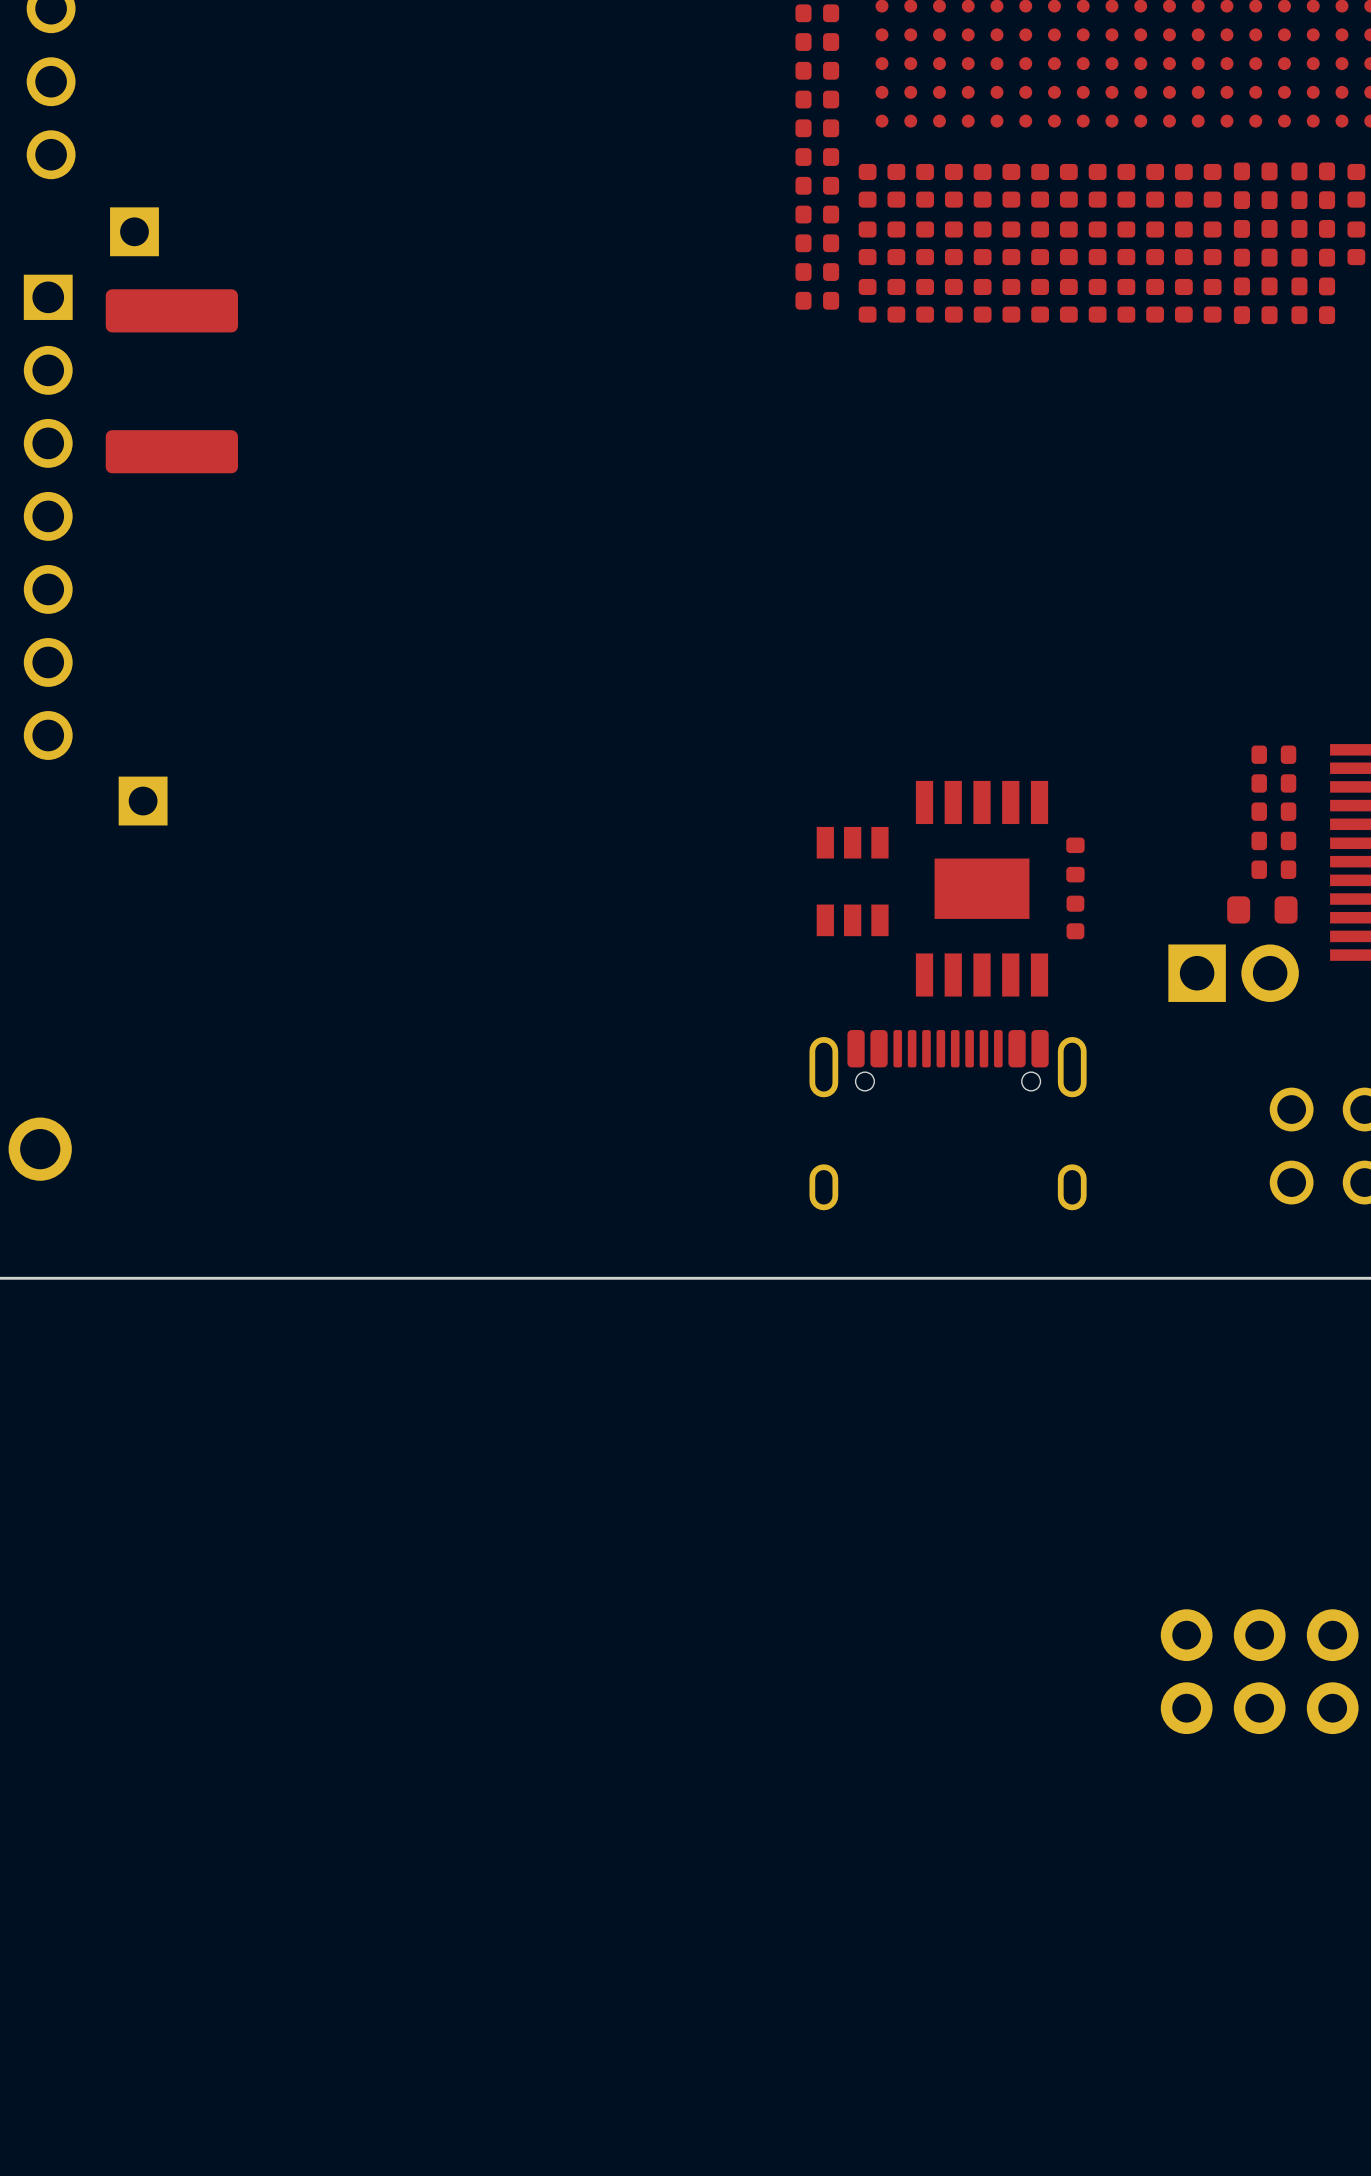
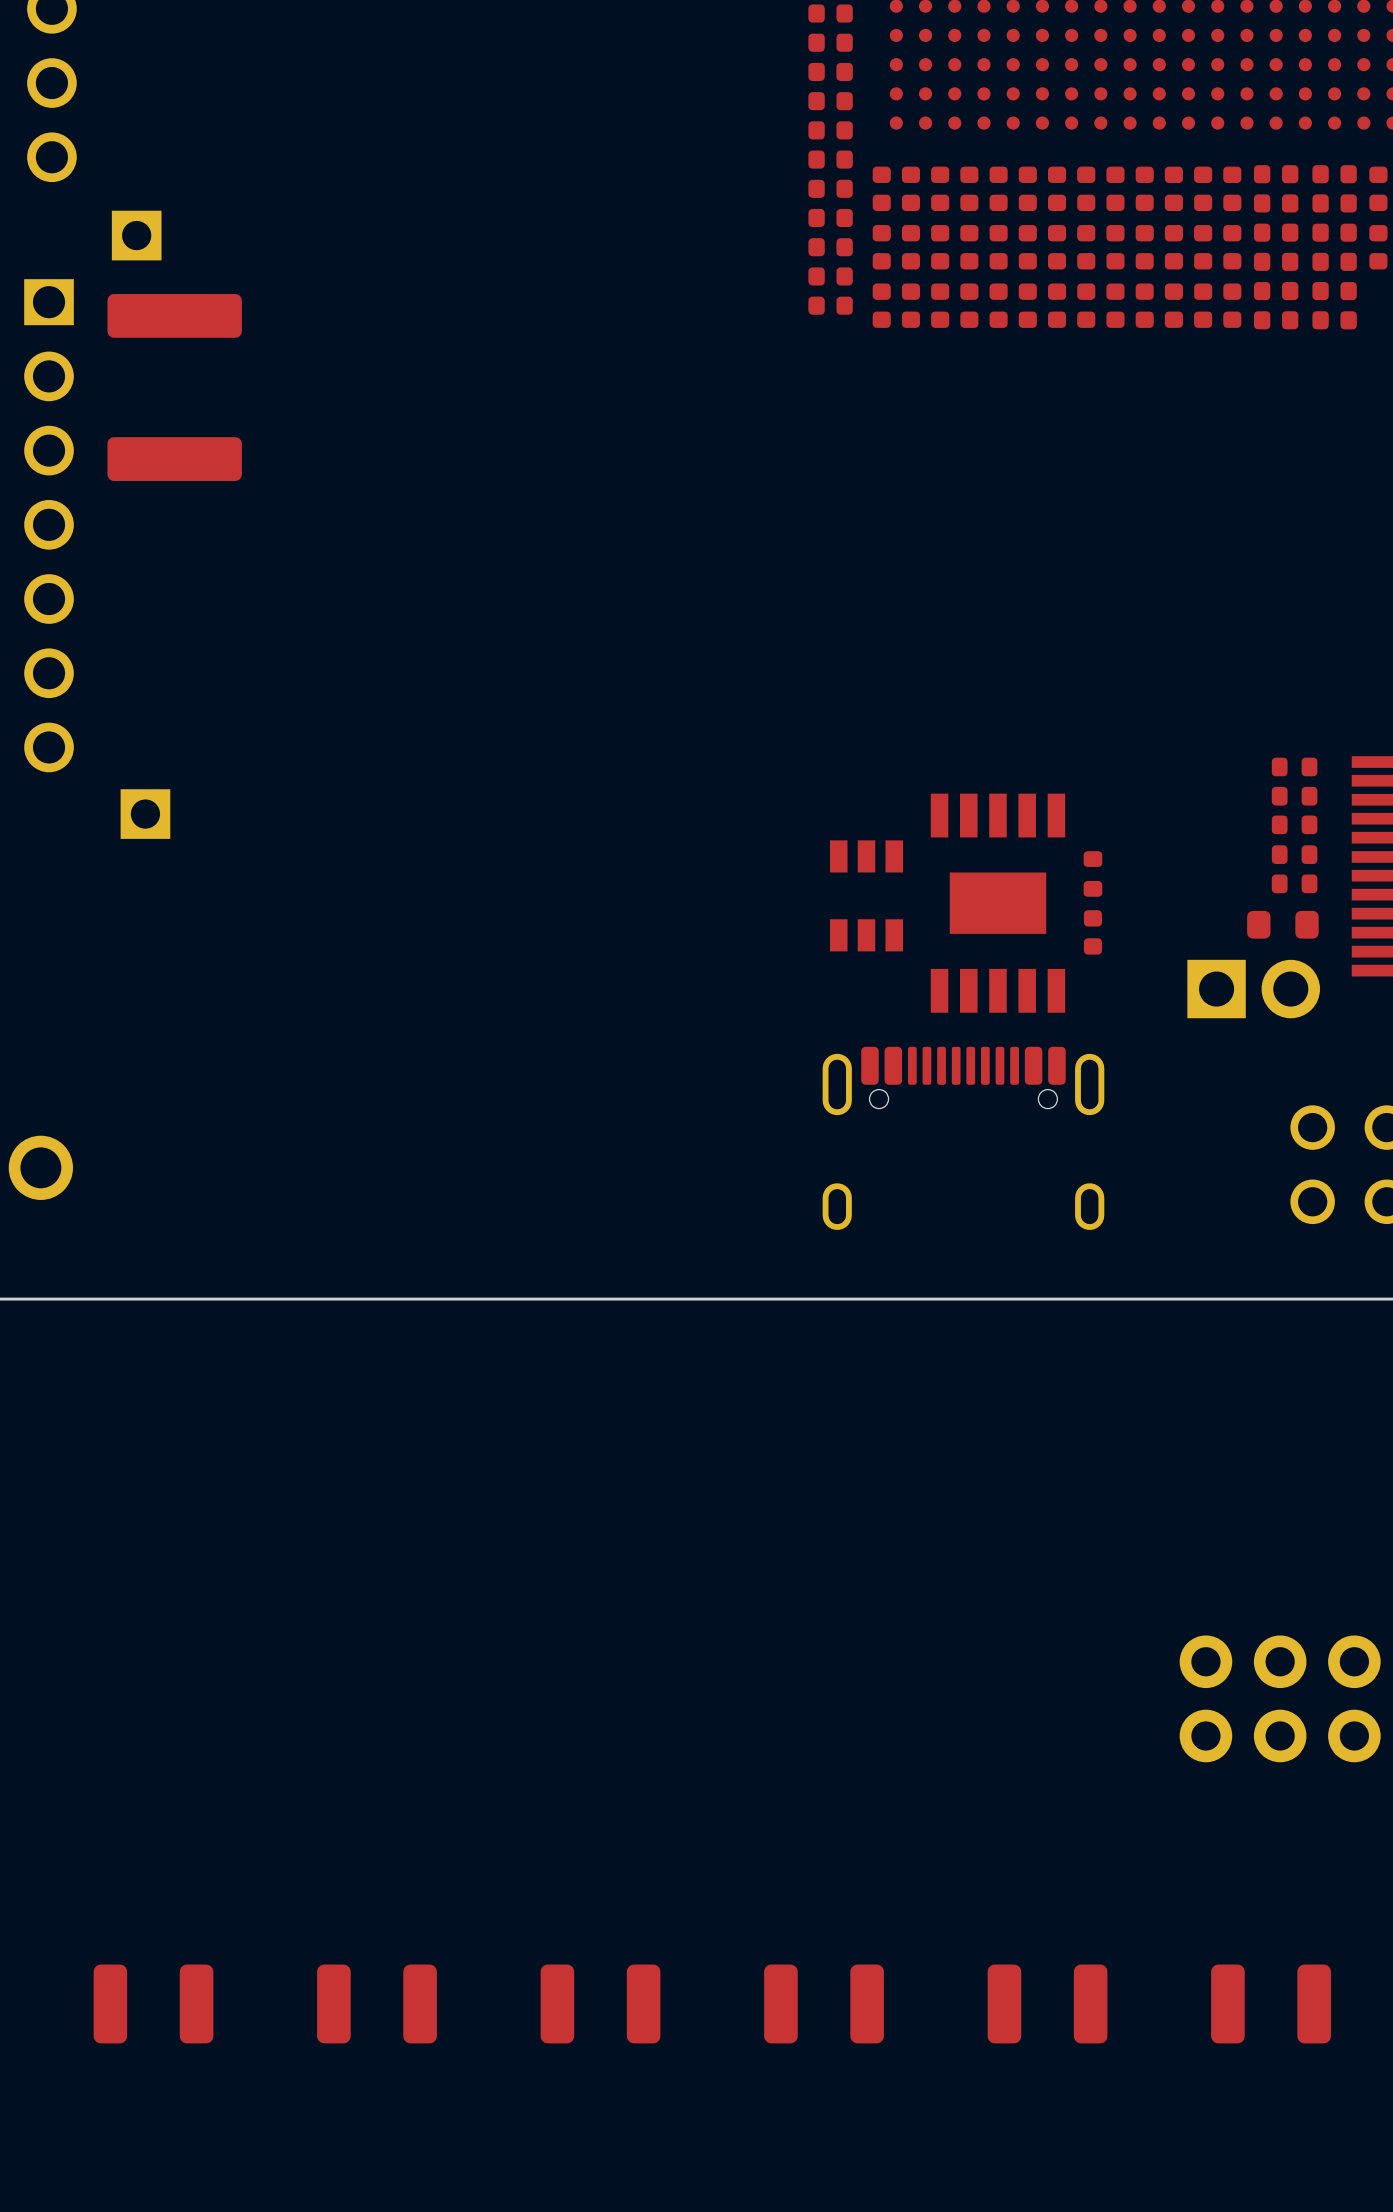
part: none -> (153, 2003)
part: none -> (376, 2003)
part: none -> (600, 2003)
part: none -> (824, 2003)
part: none -> (1047, 2003)
part: none -> (1271, 2003)

